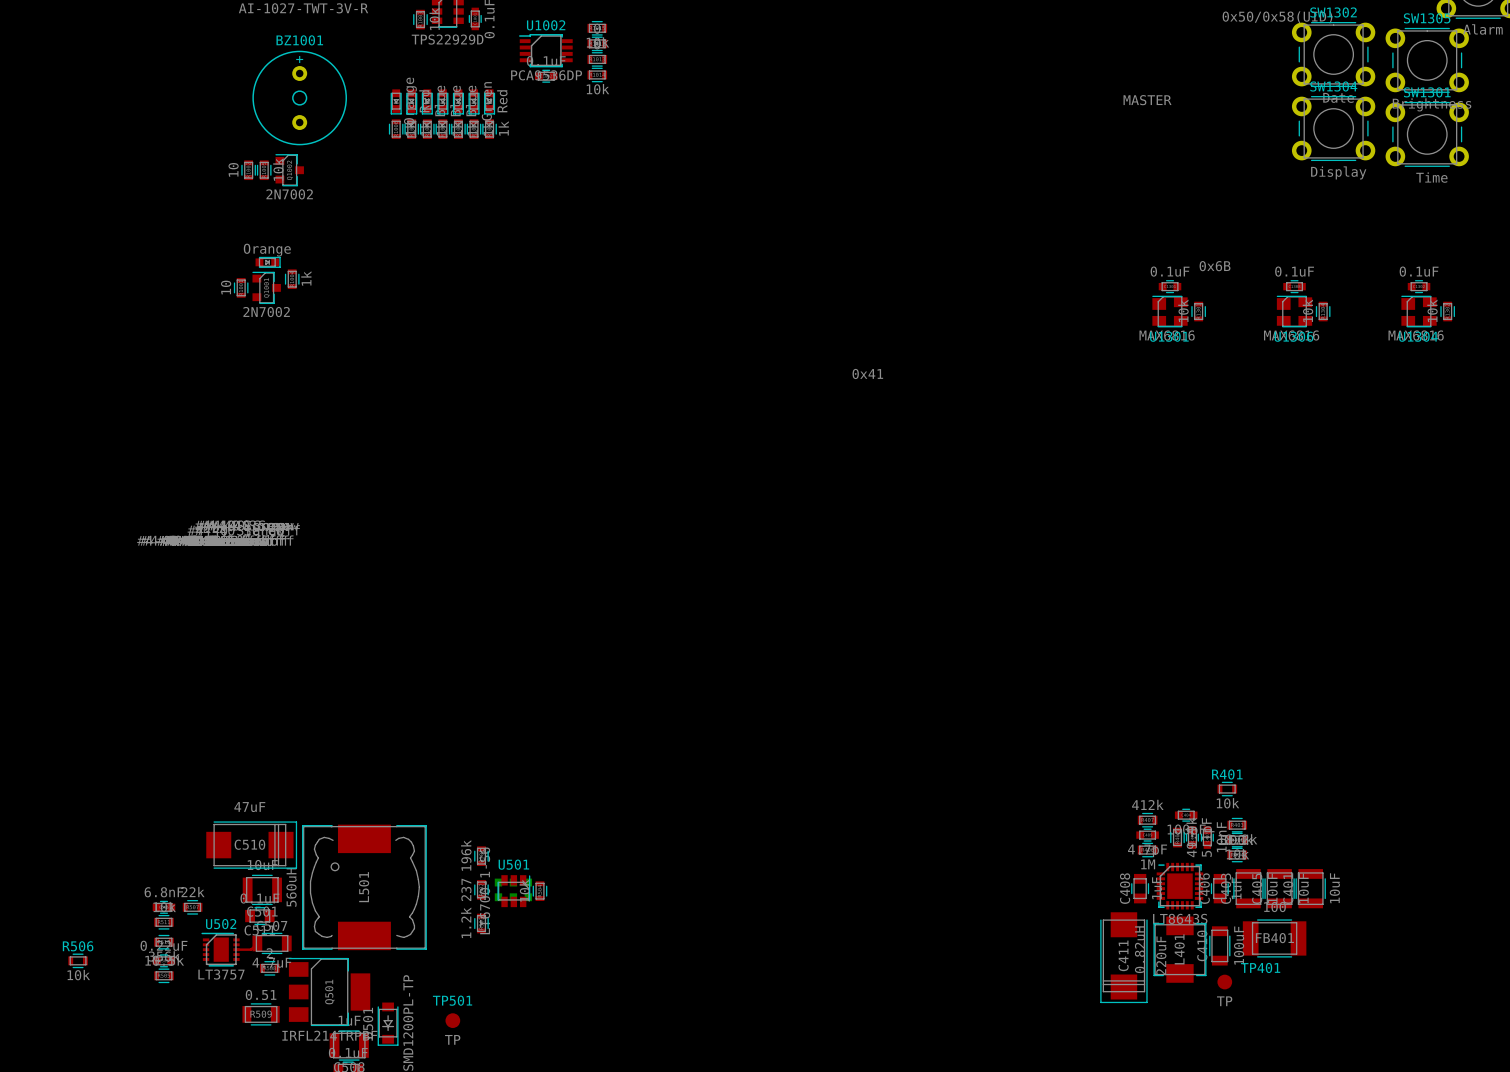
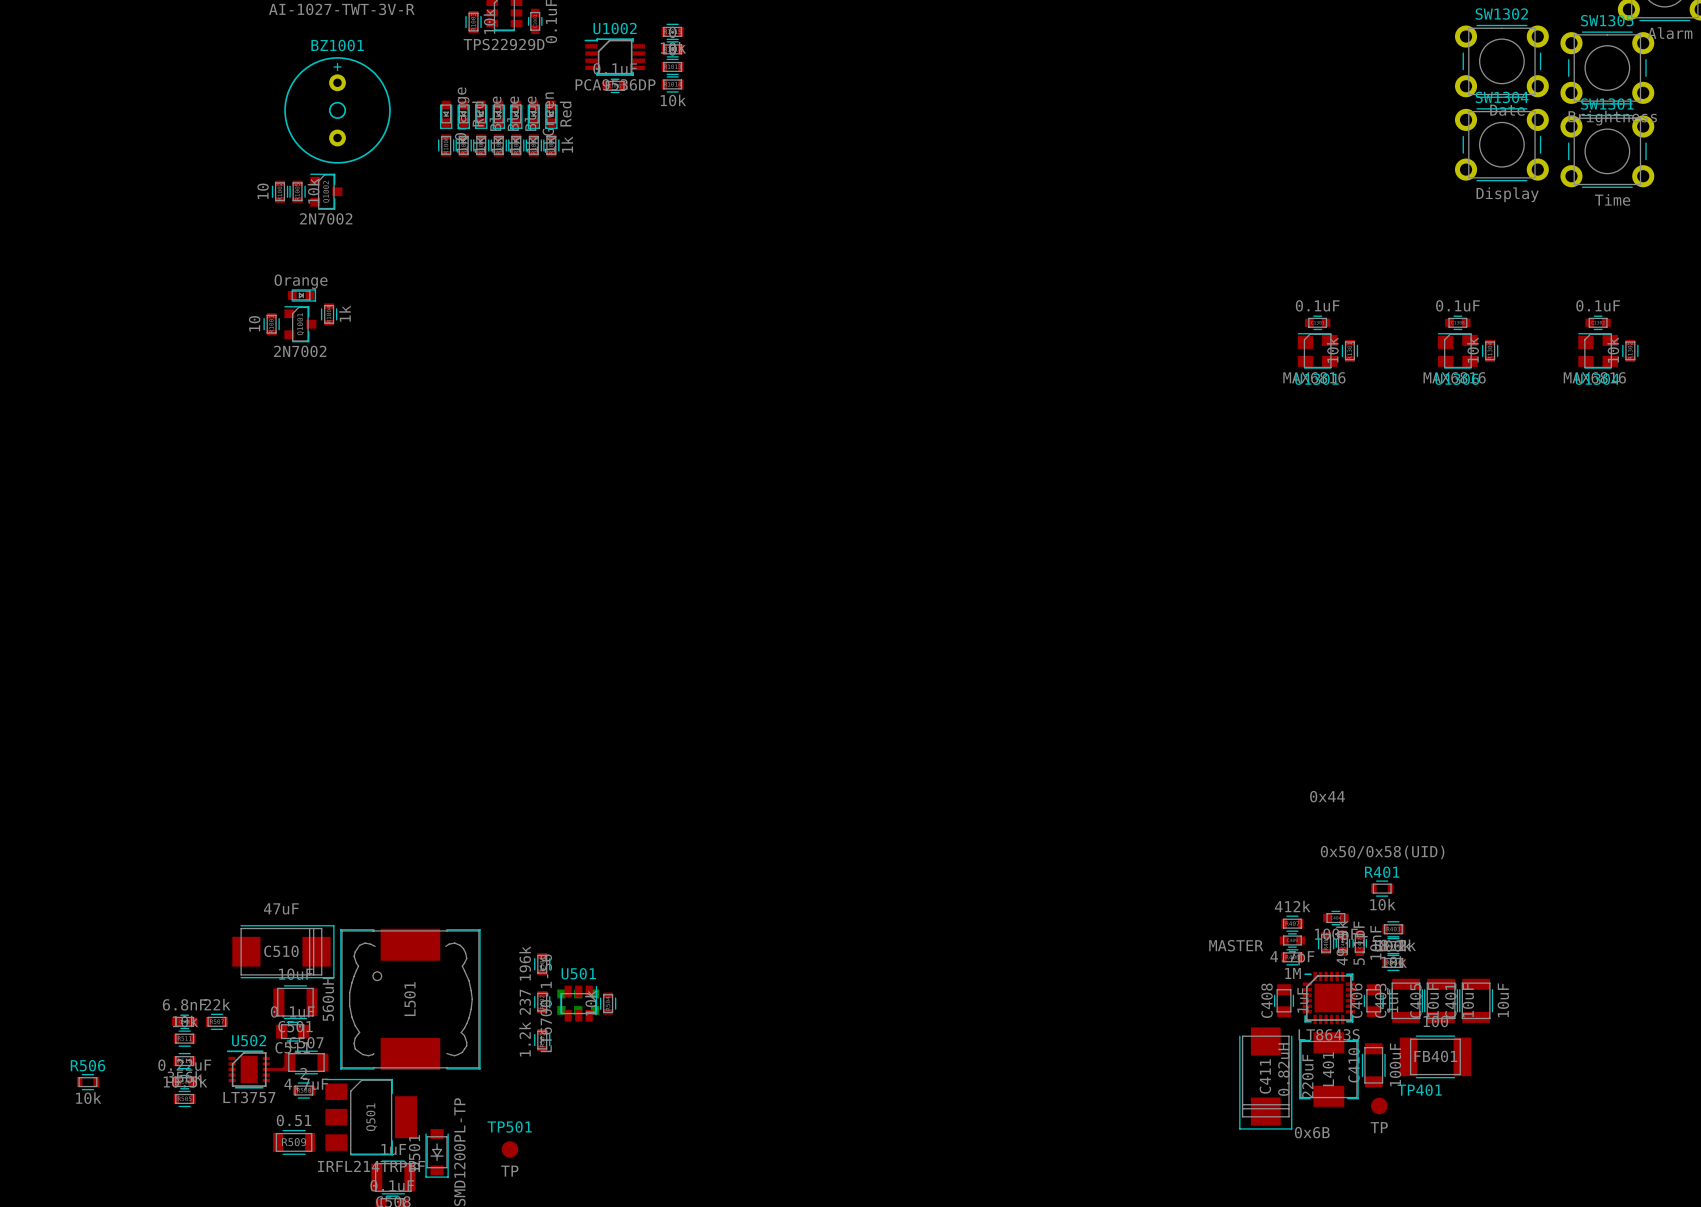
drawing: [1222, 11, 1333, 24] -> none
drawing: [1123, 95, 1172, 106] -> none
drawing: [1199, 261, 1231, 272] -> none
drawing: [852, 368, 884, 380] -> none
drawing: [137, 520, 300, 546] -> none
drawing: none -> [1310, 790, 1345, 803]
drawing: none -> [1320, 845, 1445, 860]
drawing: none -> [1209, 939, 1264, 952]
drawing: none -> [1294, 1126, 1330, 1139]

